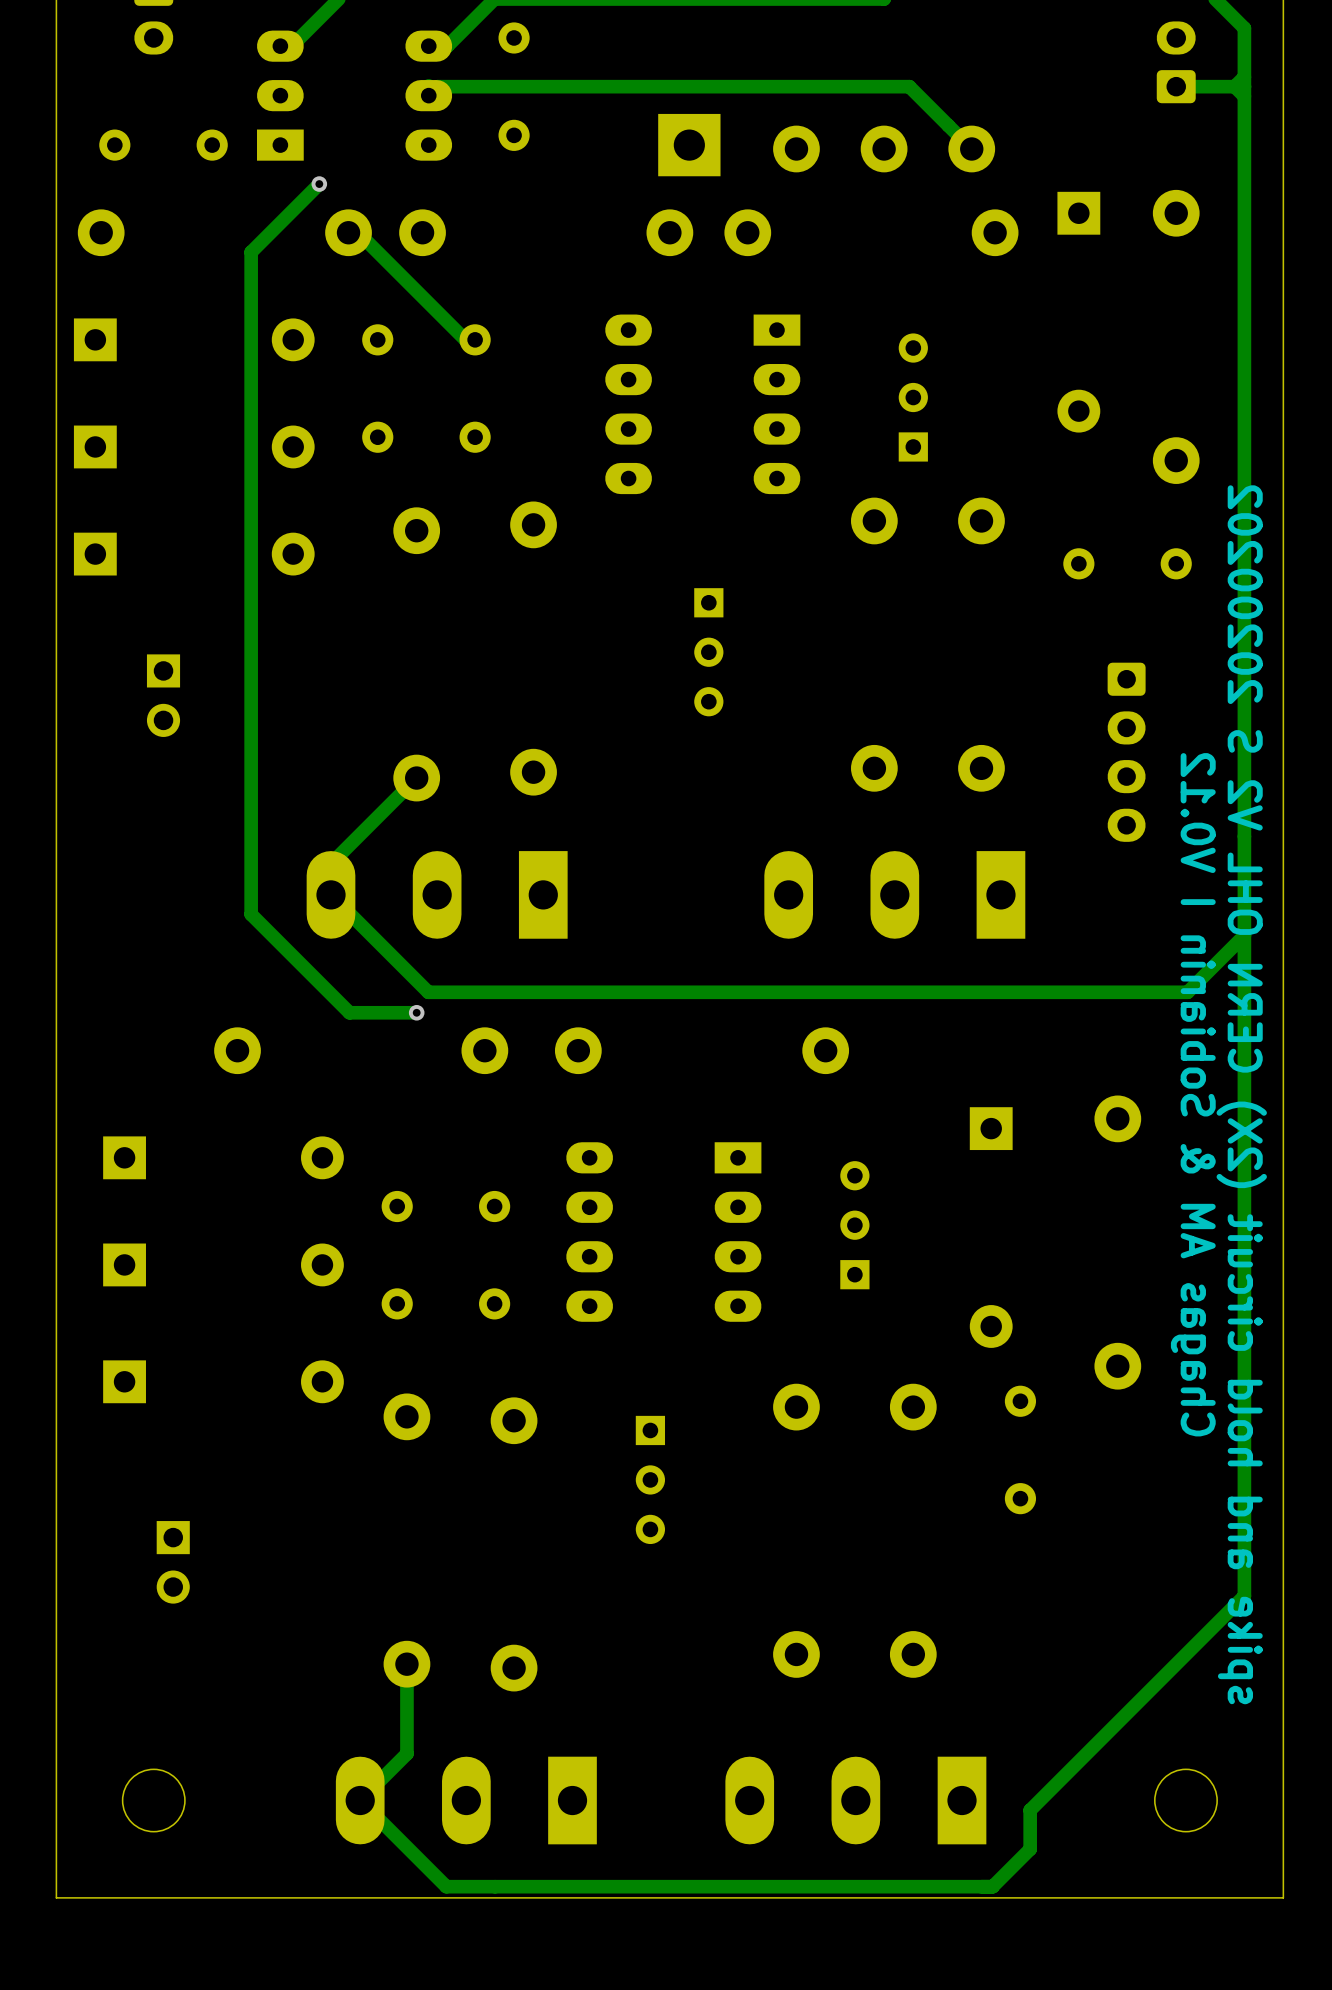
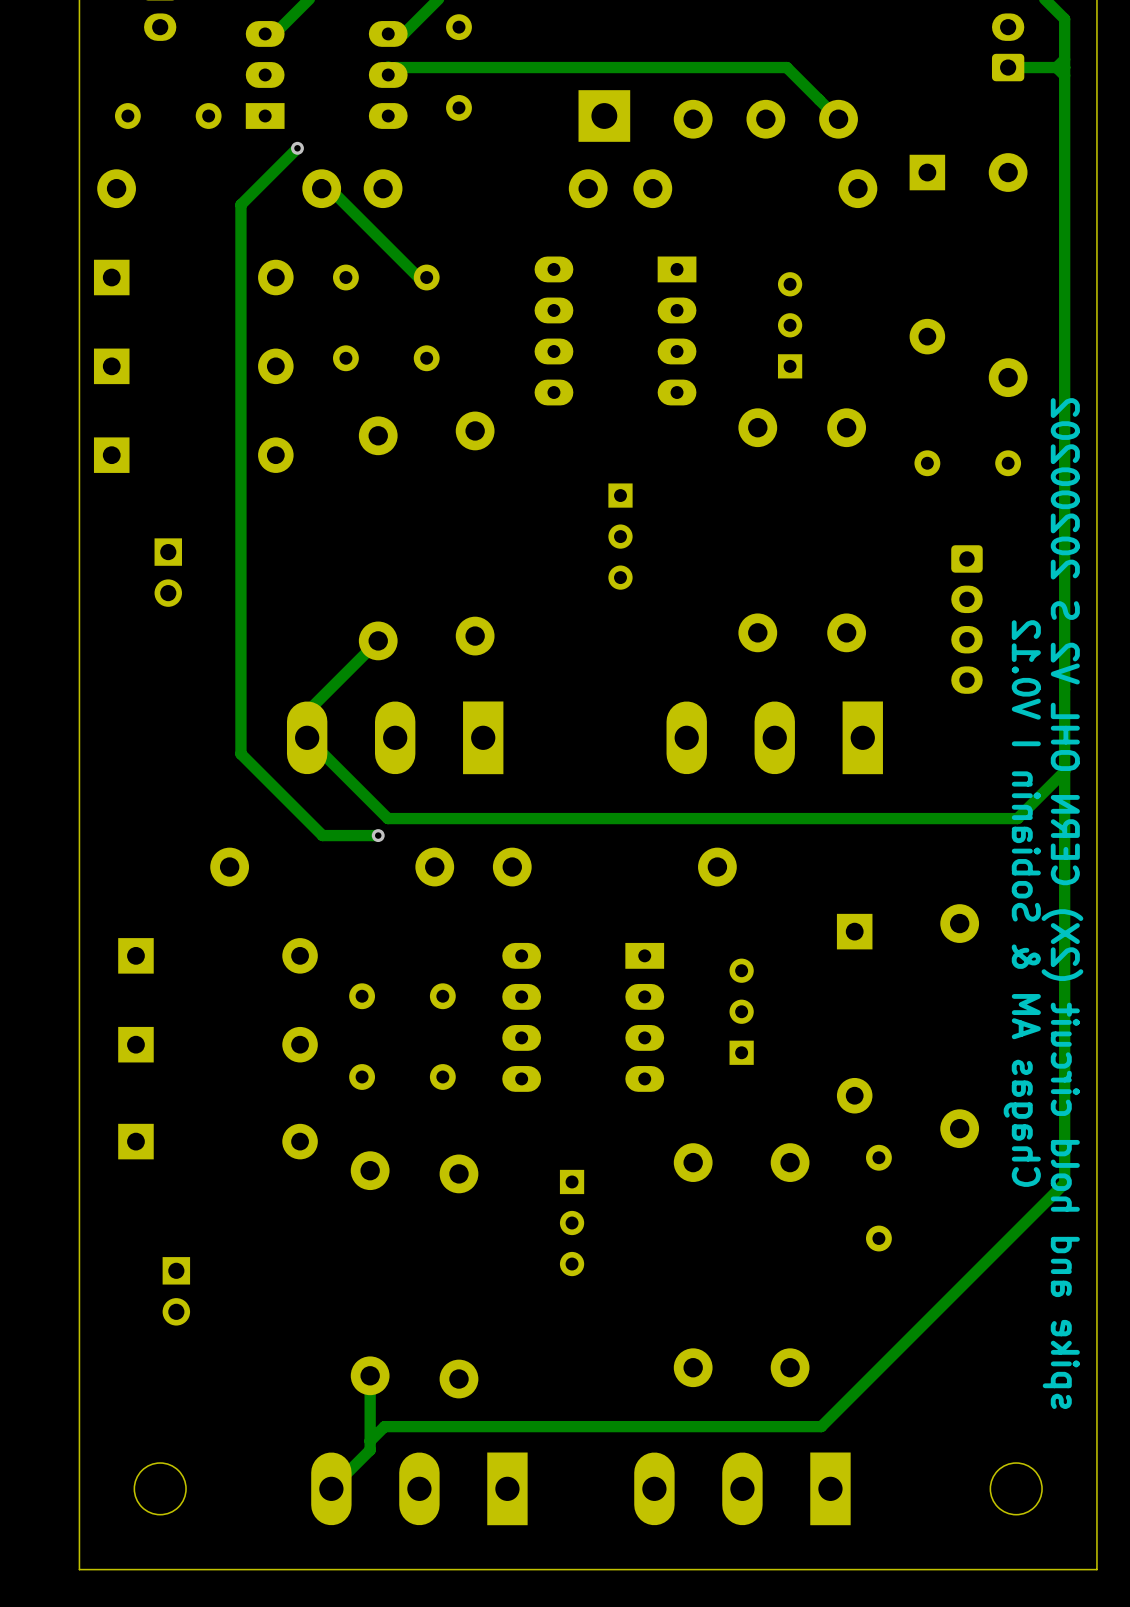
track: (1244, 1432) (1244, 1596) (1030, 1810) (1030, 1849) (992, 1886) (446, 1886) (360, 1800) -> (1064, 1183) (821, 1426) (384, 1426) (370, 1441)

